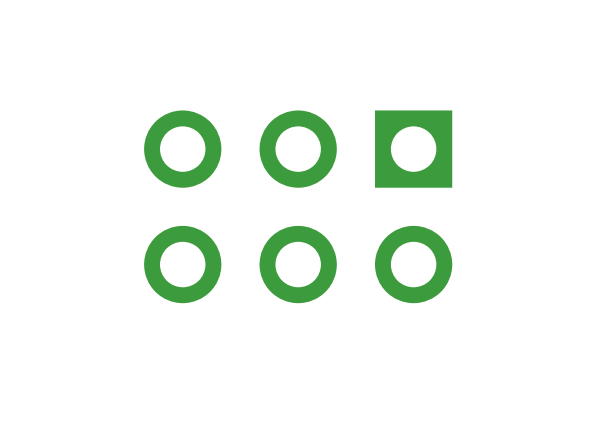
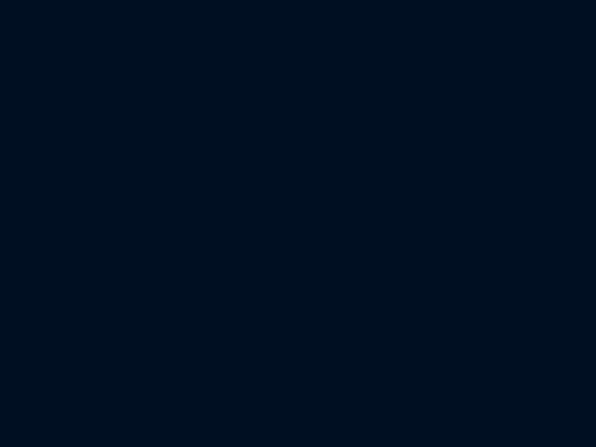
part: (298, 206) -> none

